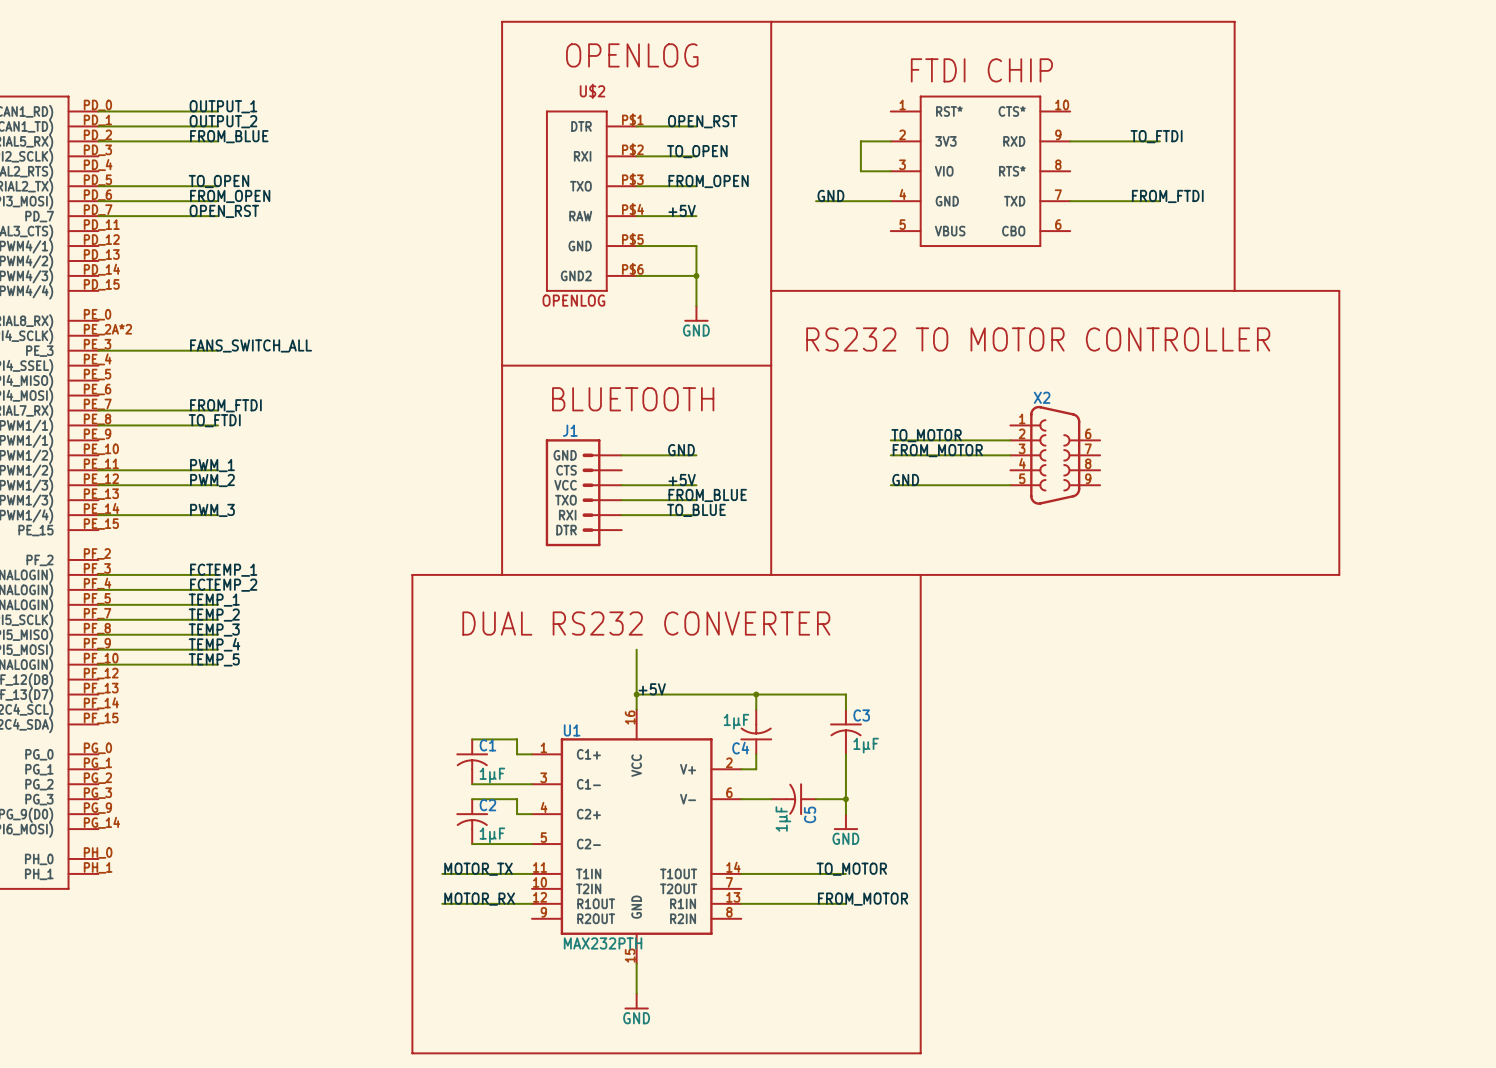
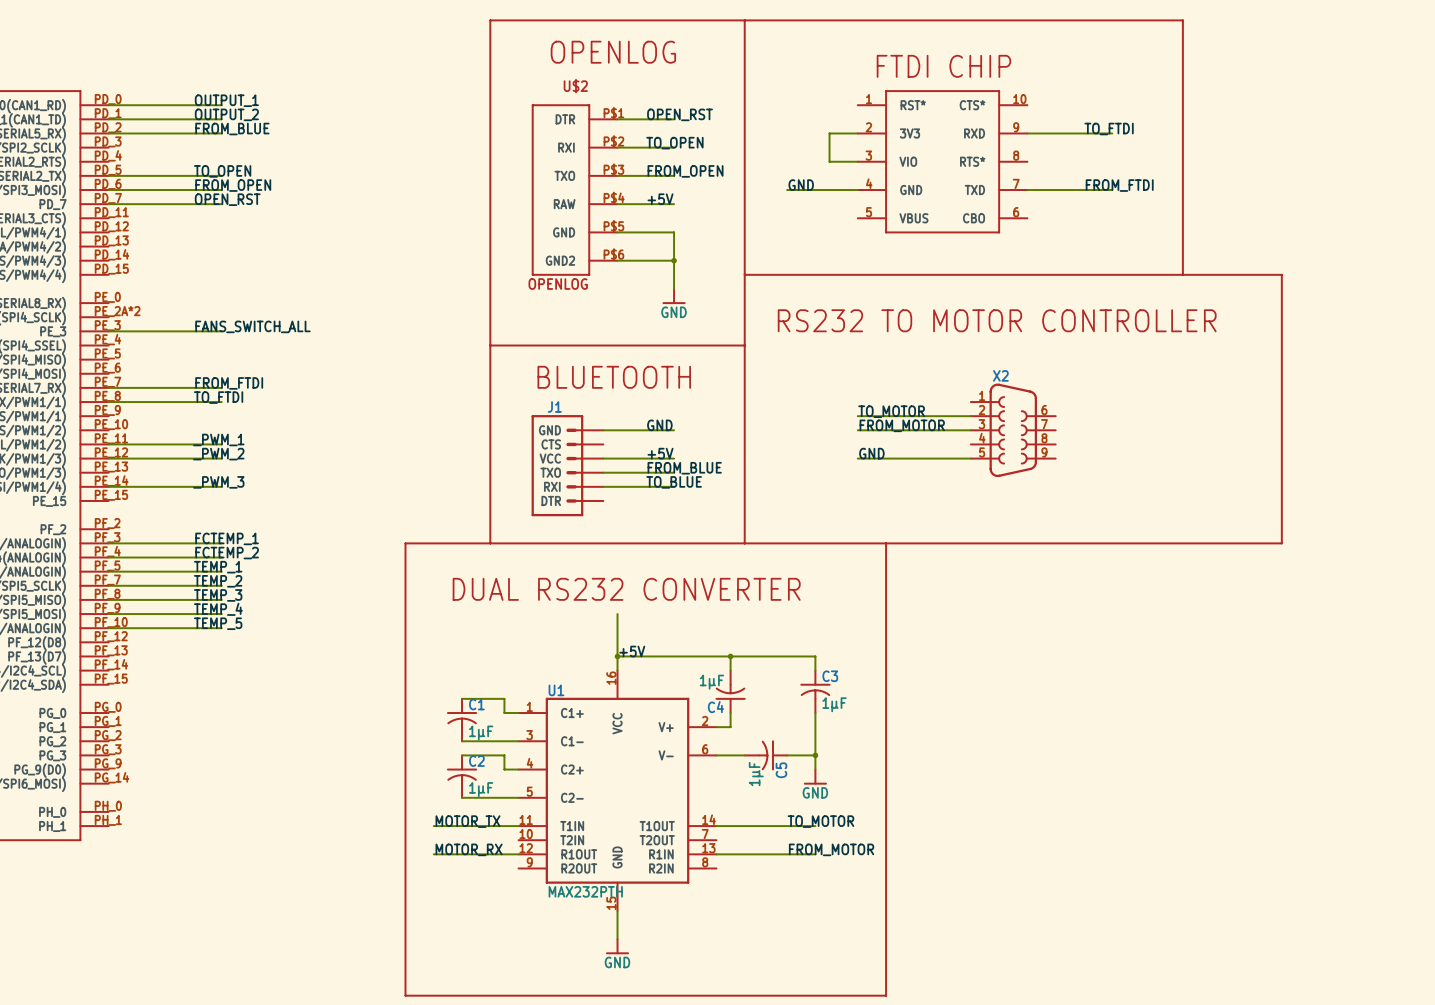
label: PWM_1 (212, 465) -> _PWM_1 (218, 439)
label: PWM_2 (212, 480) -> _PWM_2 (218, 454)
label: PWM_3 (212, 510) -> _PWM_3 (218, 482)

